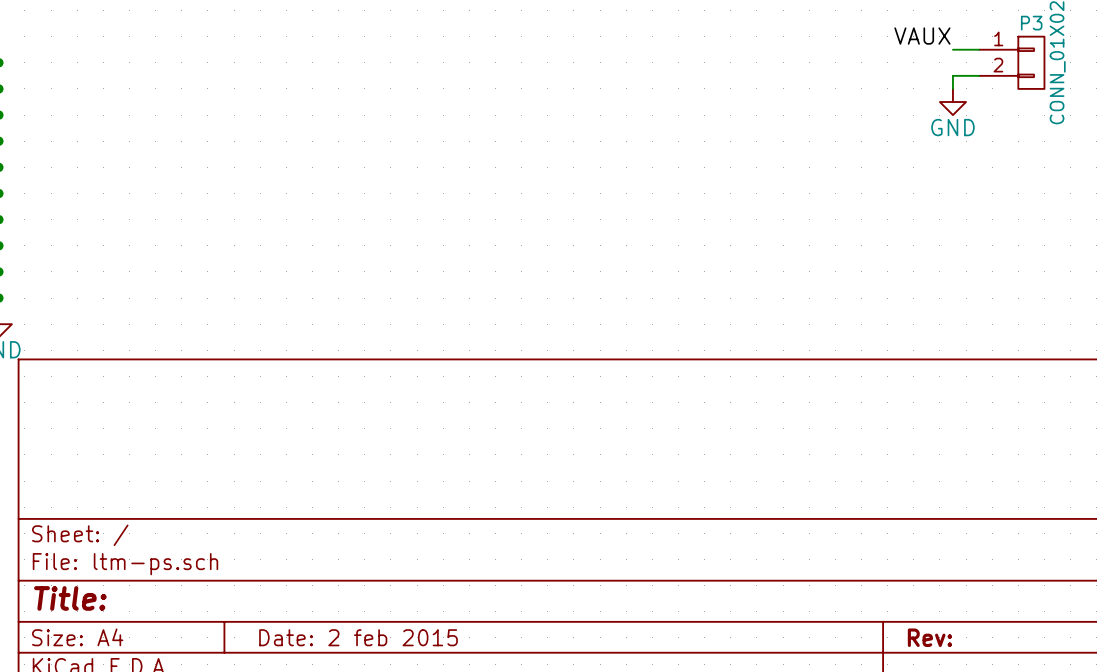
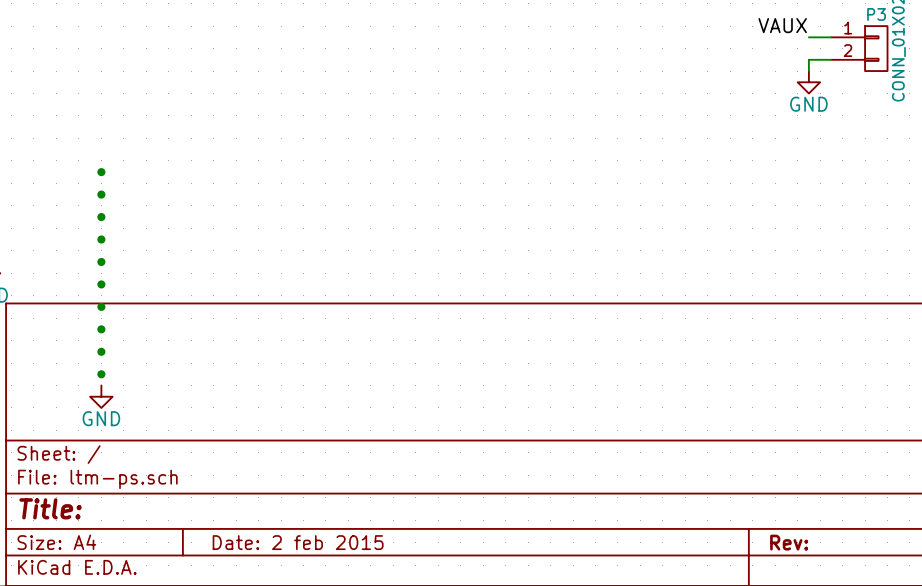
junction: none -> (101, 172)
junction: none -> (101, 194)
junction: none -> (101, 217)
junction: none -> (101, 239)
junction: none -> (101, 261)
junction: none -> (101, 284)
junction: none -> (101, 306)
junction: none -> (101, 329)
junction: none -> (101, 351)
junction: none -> (101, 374)
power symbol: none -> GND (101, 396)

